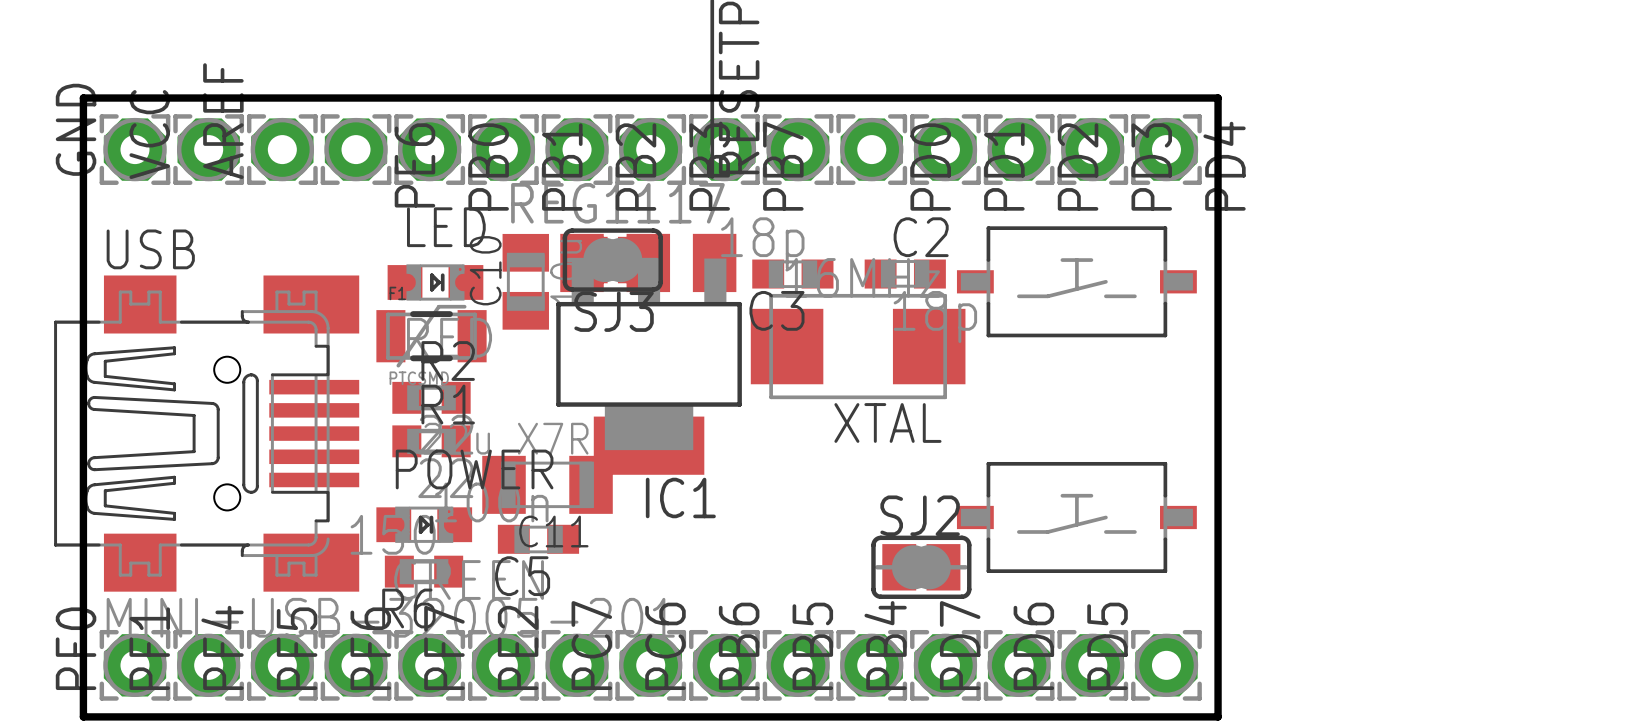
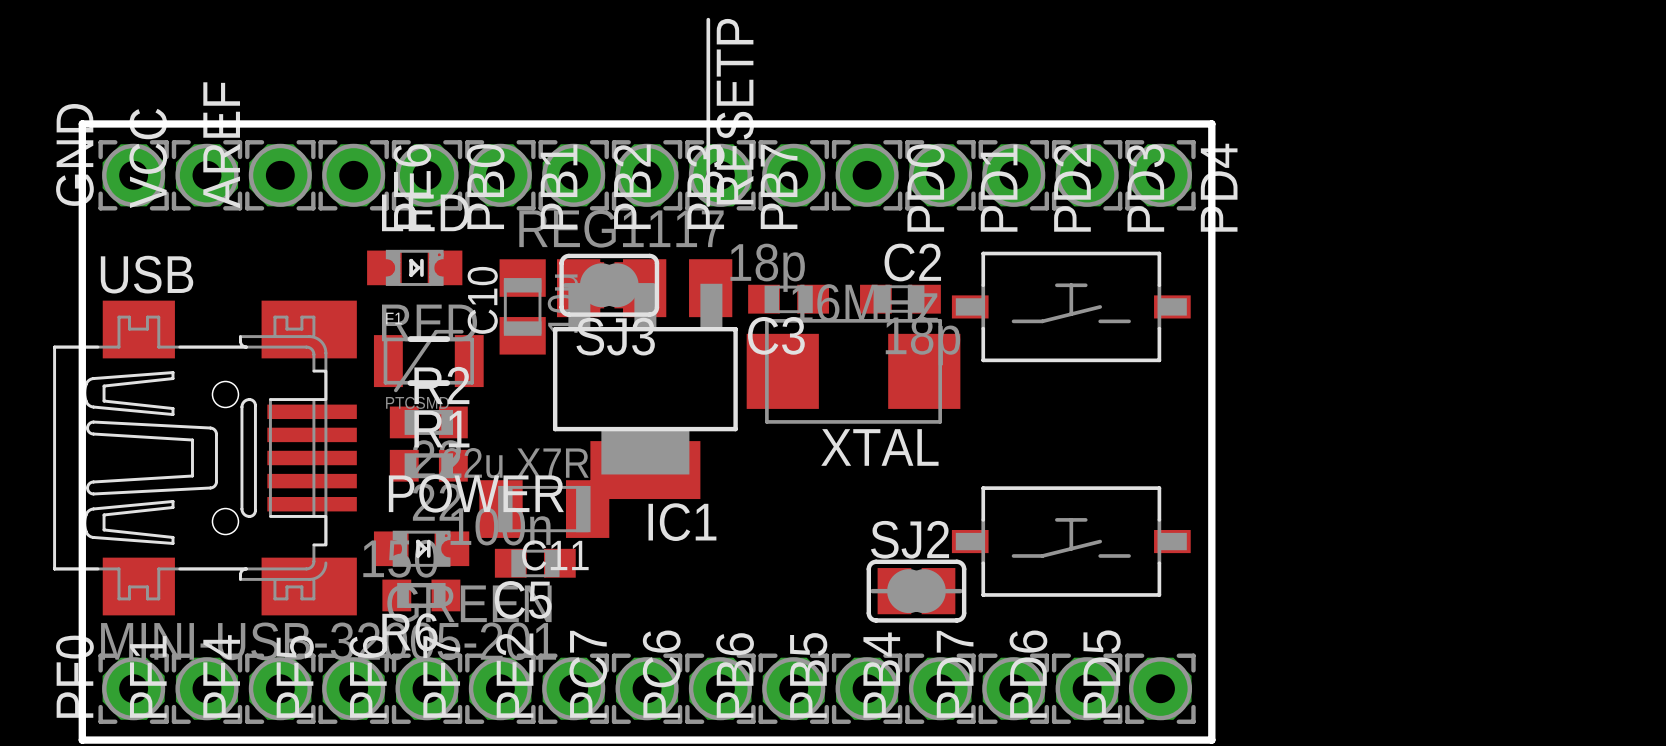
LED position: (435, 282) -> (414, 267)

